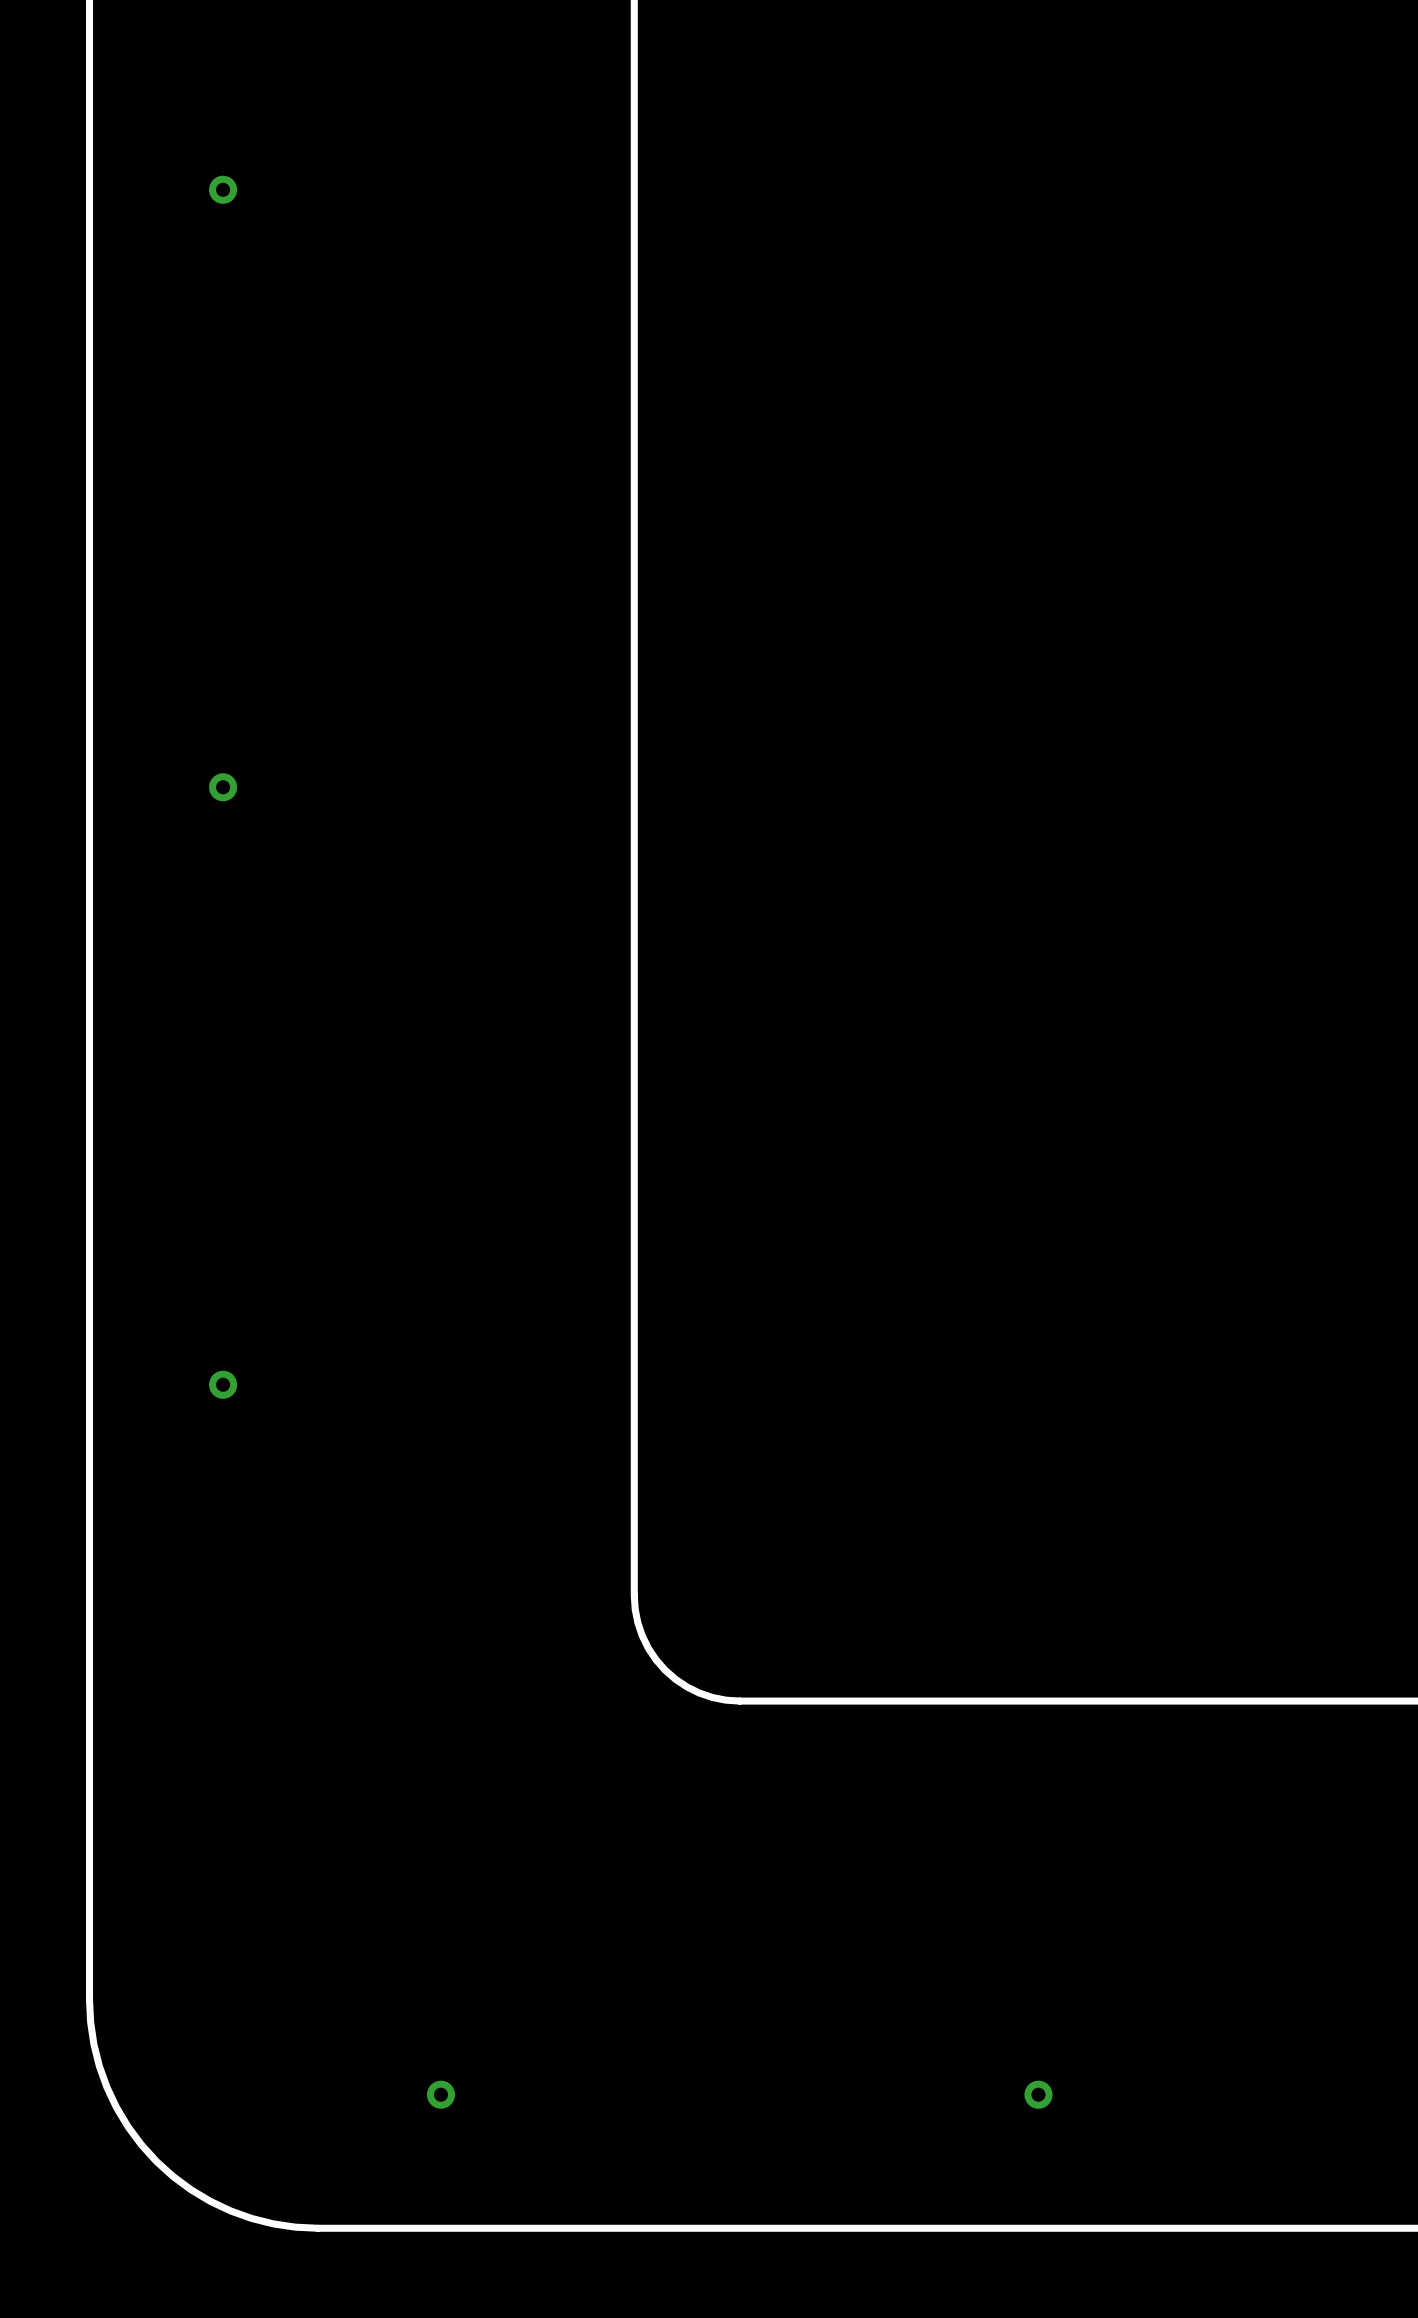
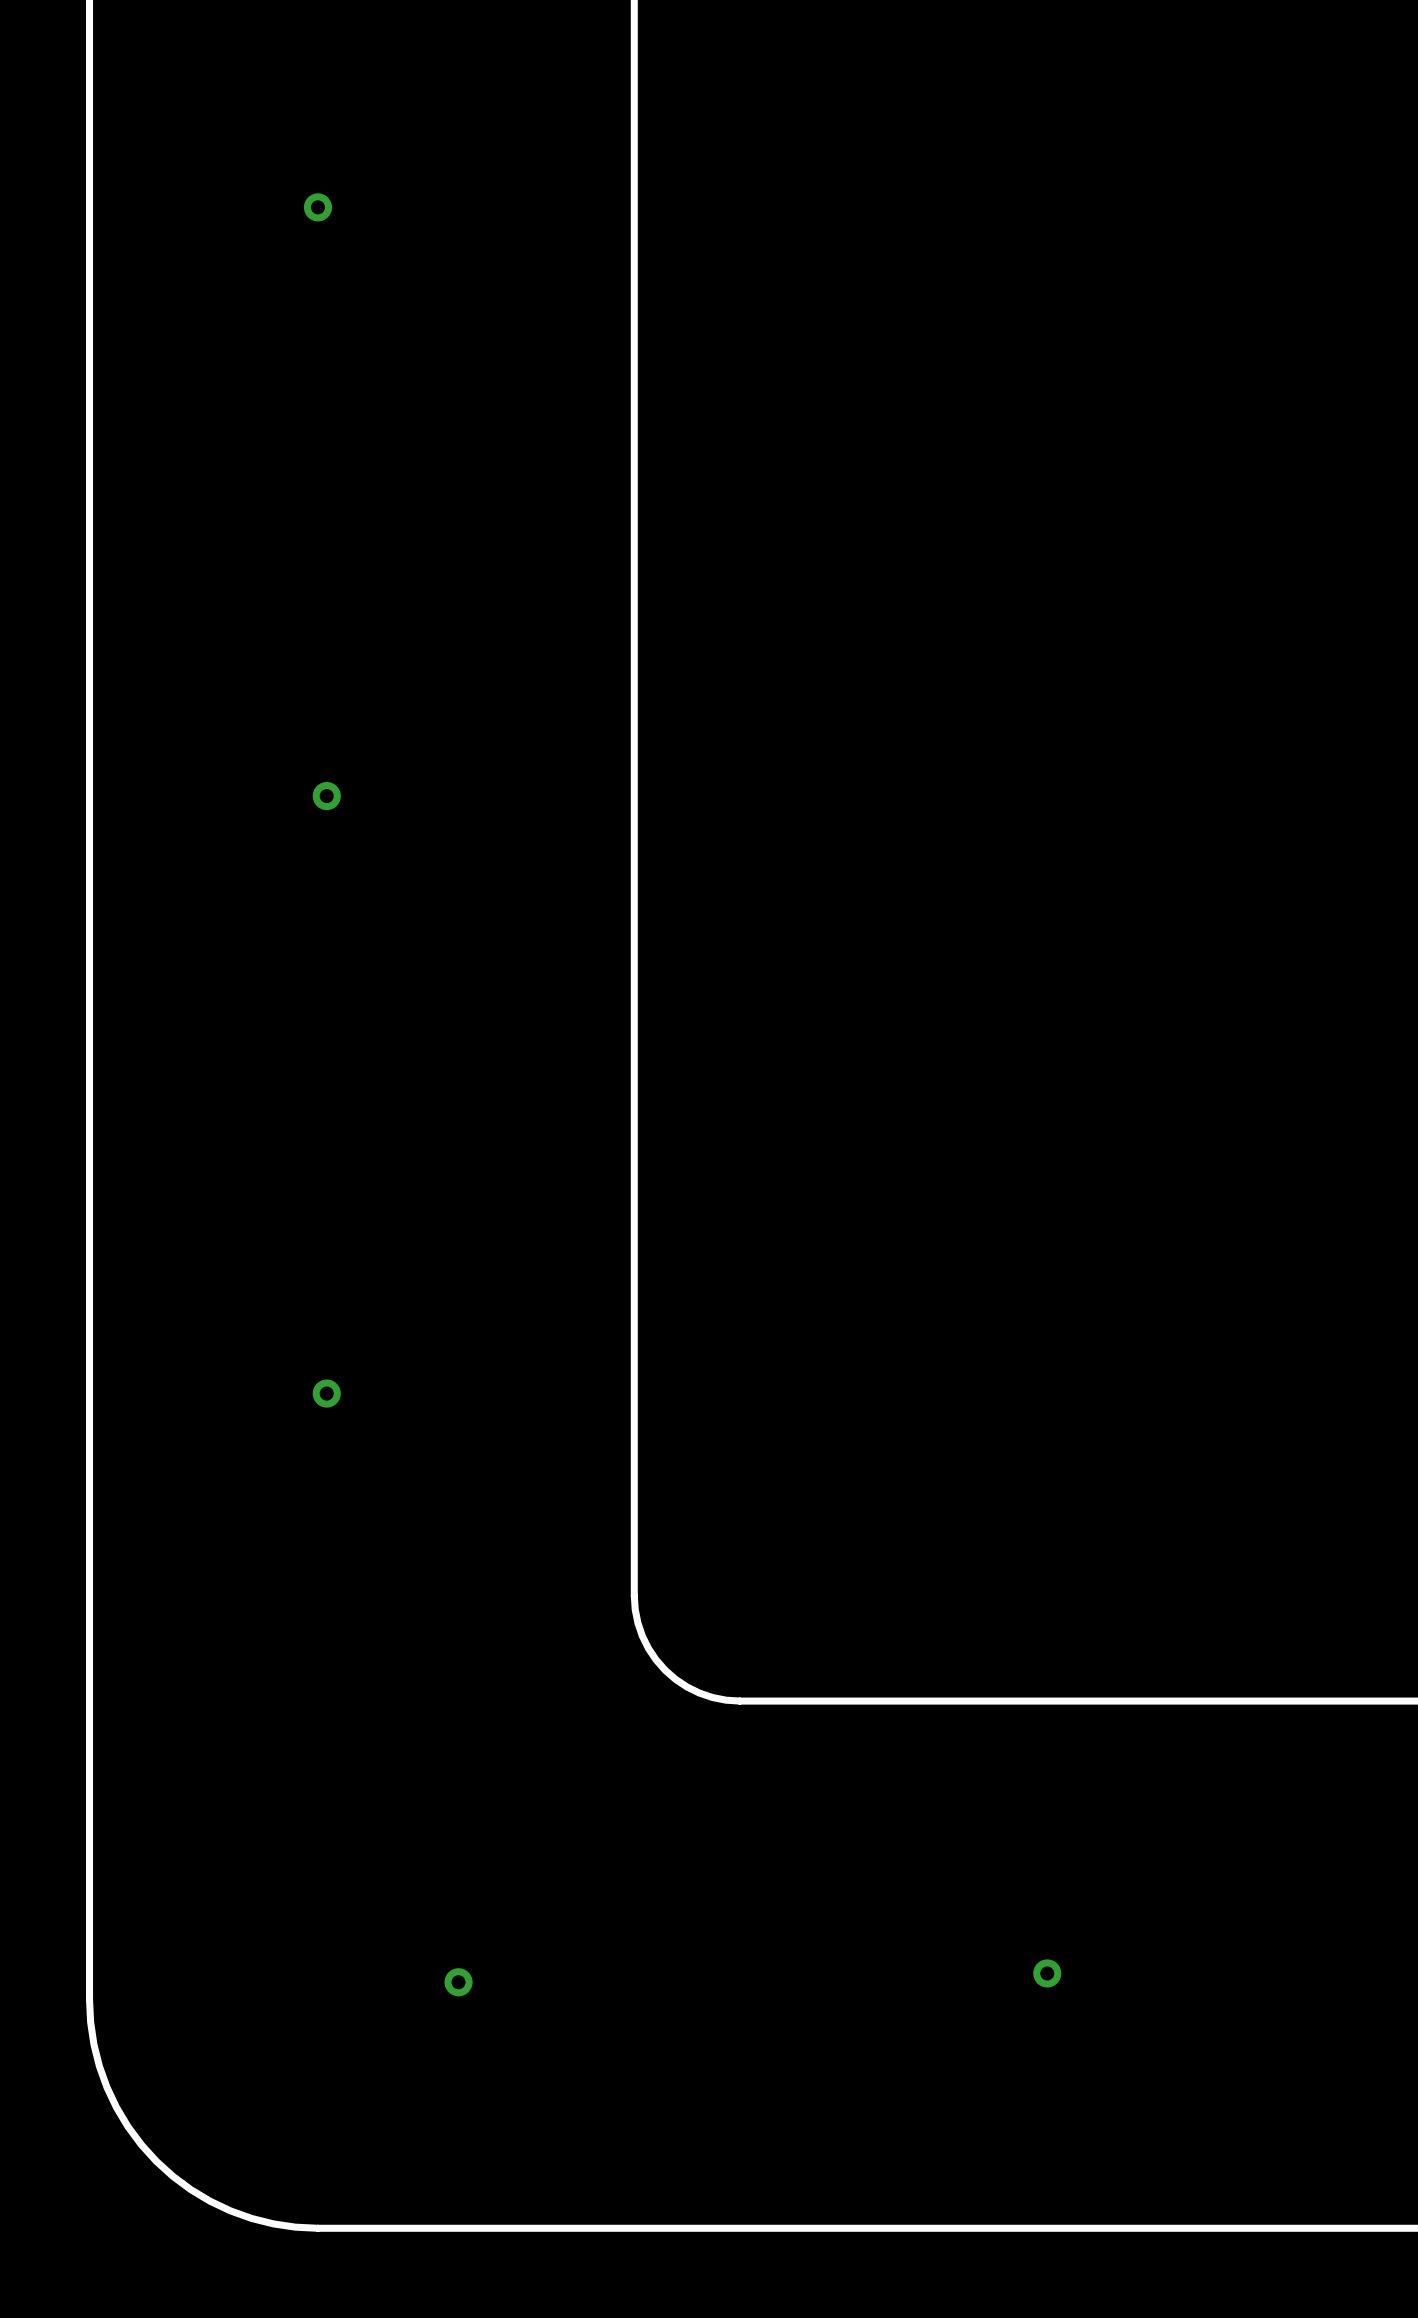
via position: (223, 189) -> (317, 207)
via position: (223, 787) -> (326, 796)
via position: (223, 1384) -> (326, 1393)
via position: (440, 2094) -> (458, 1982)
via position: (1038, 2094) -> (1047, 1973)

